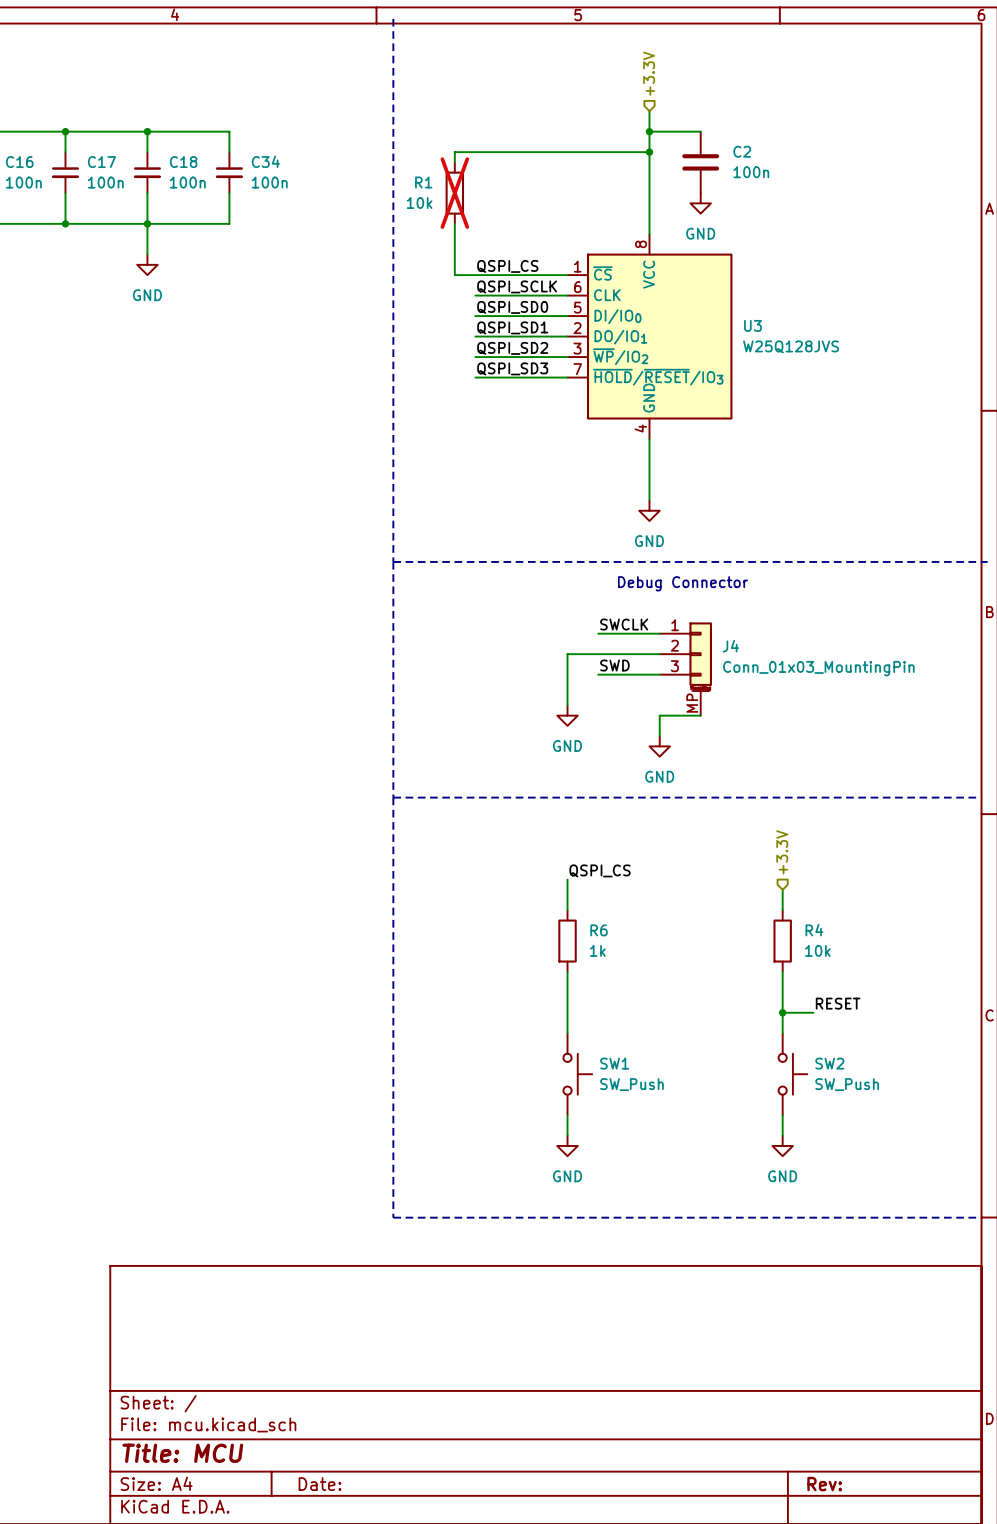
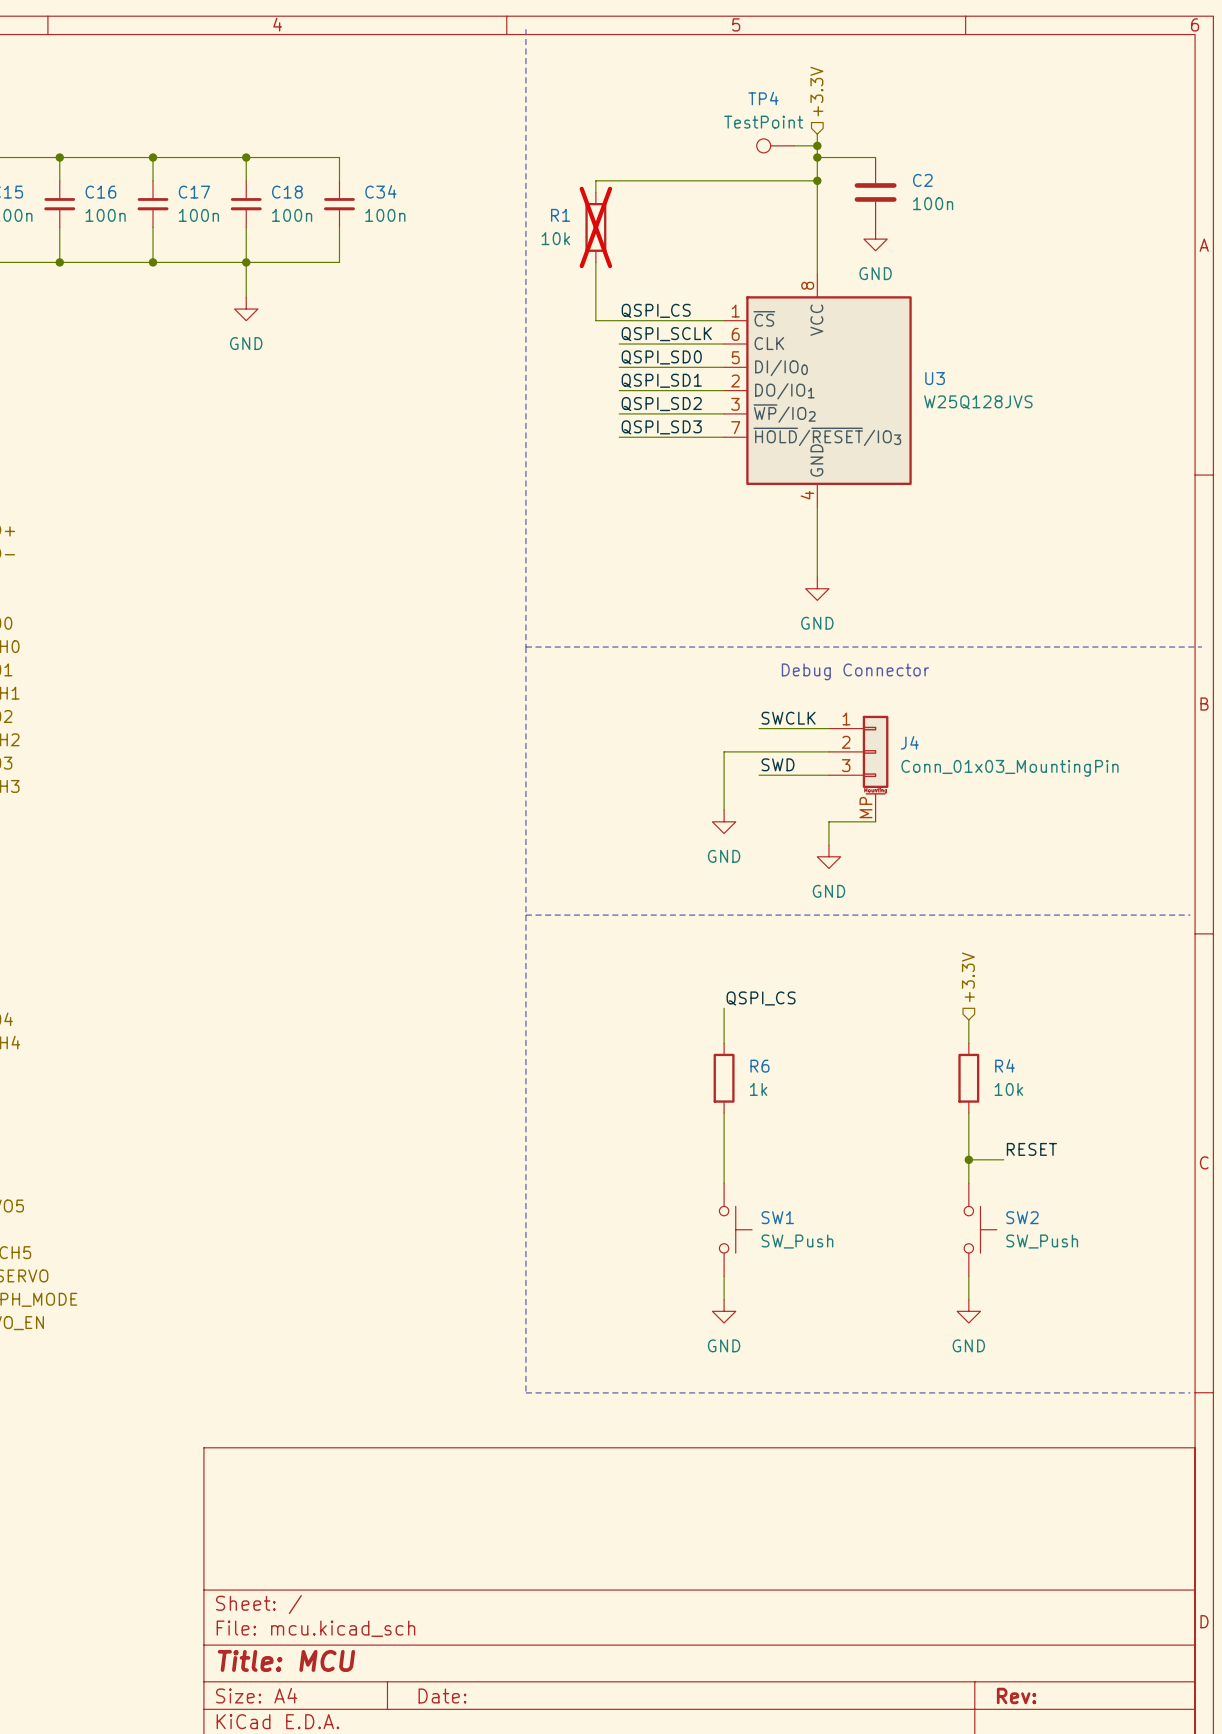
TP4: none -> TestPoint (775, 145)
wire: none -> (794, 145) (817, 145)
junction: none -> (817, 145)

